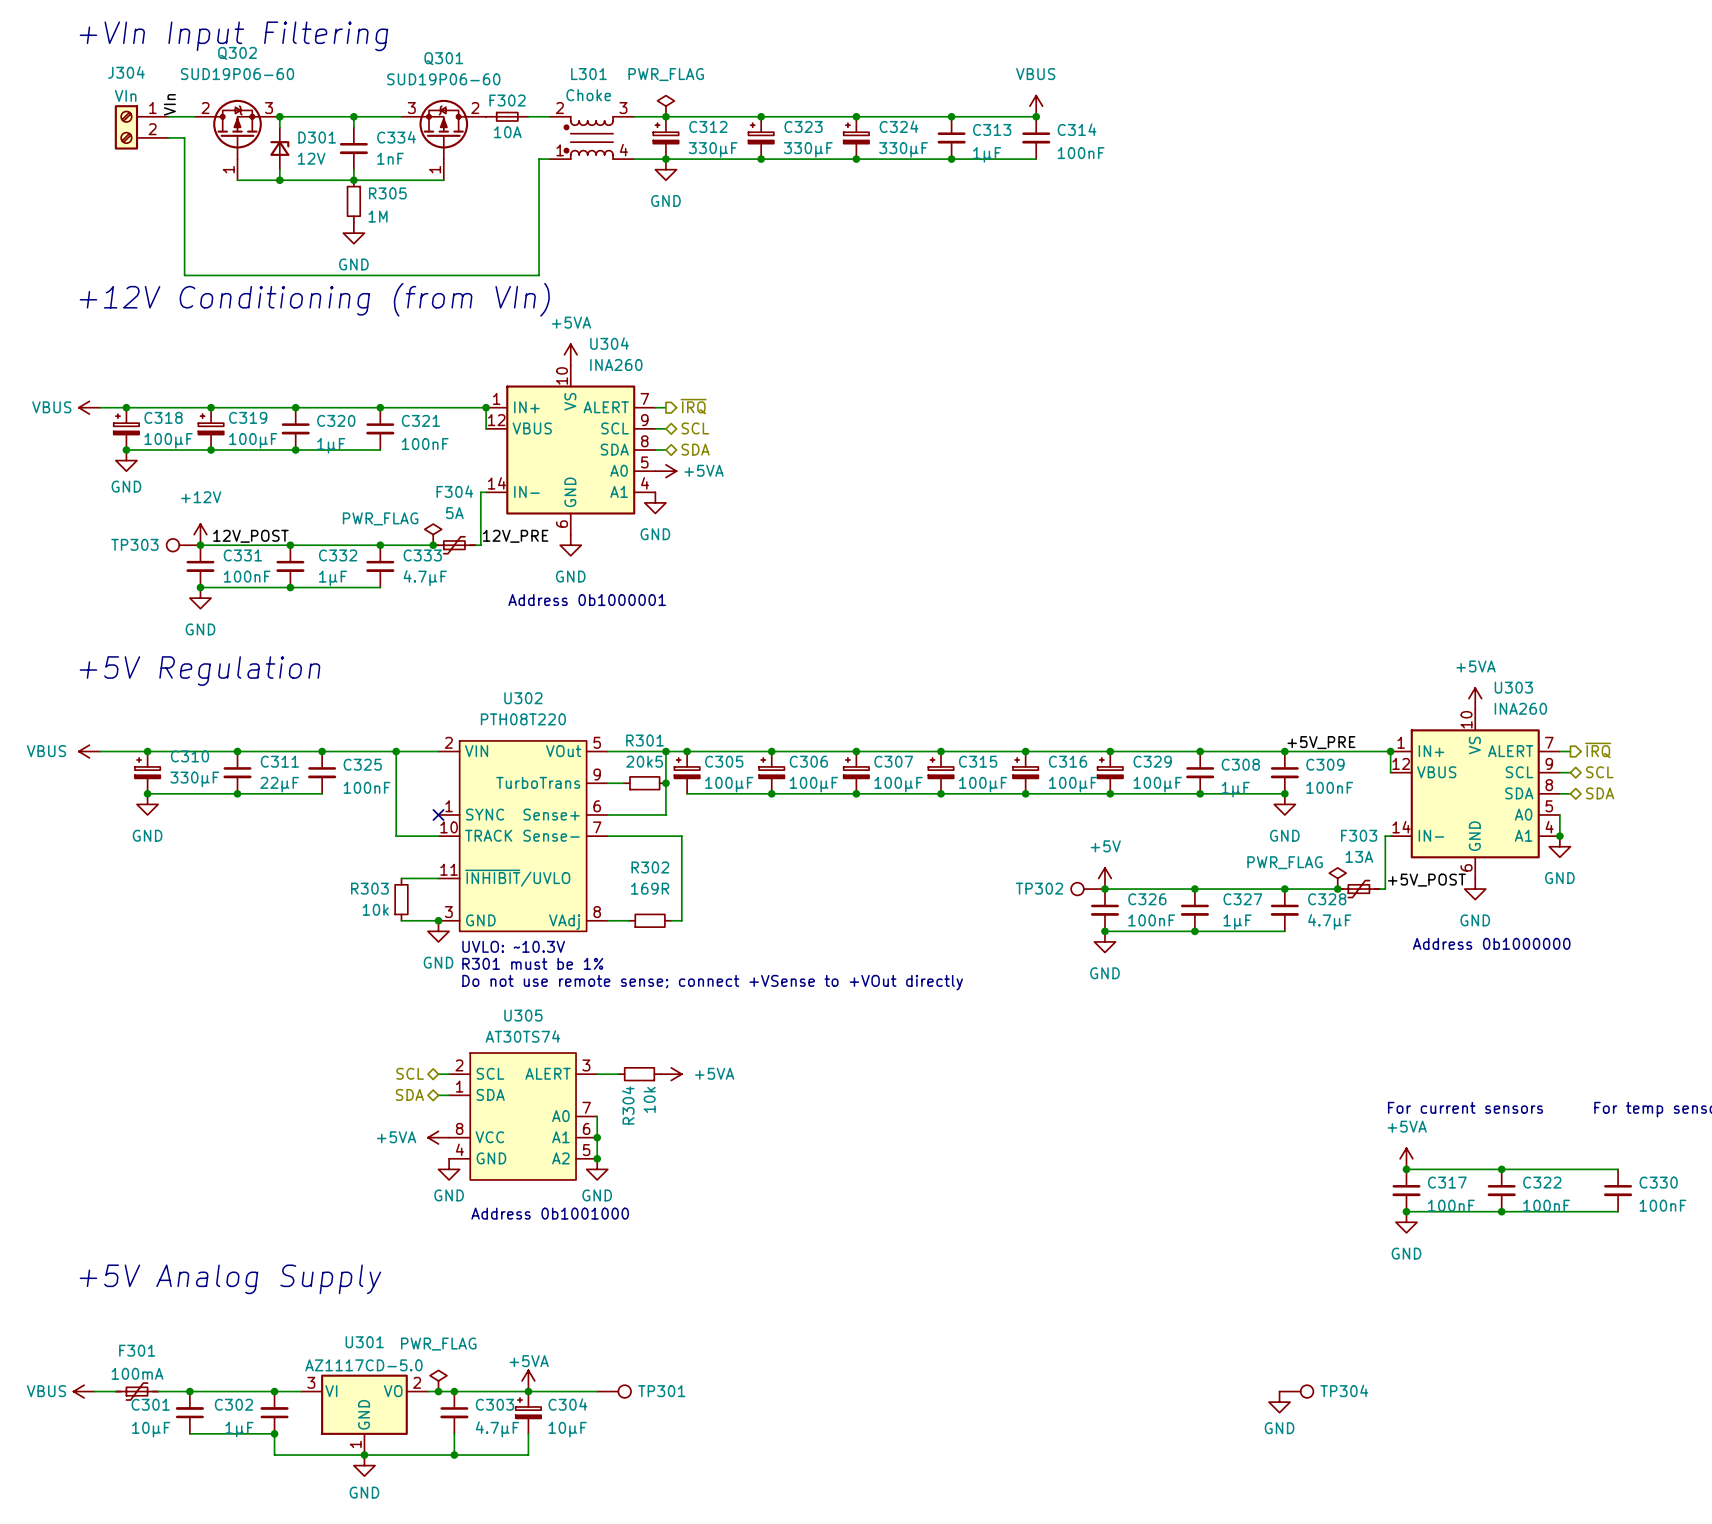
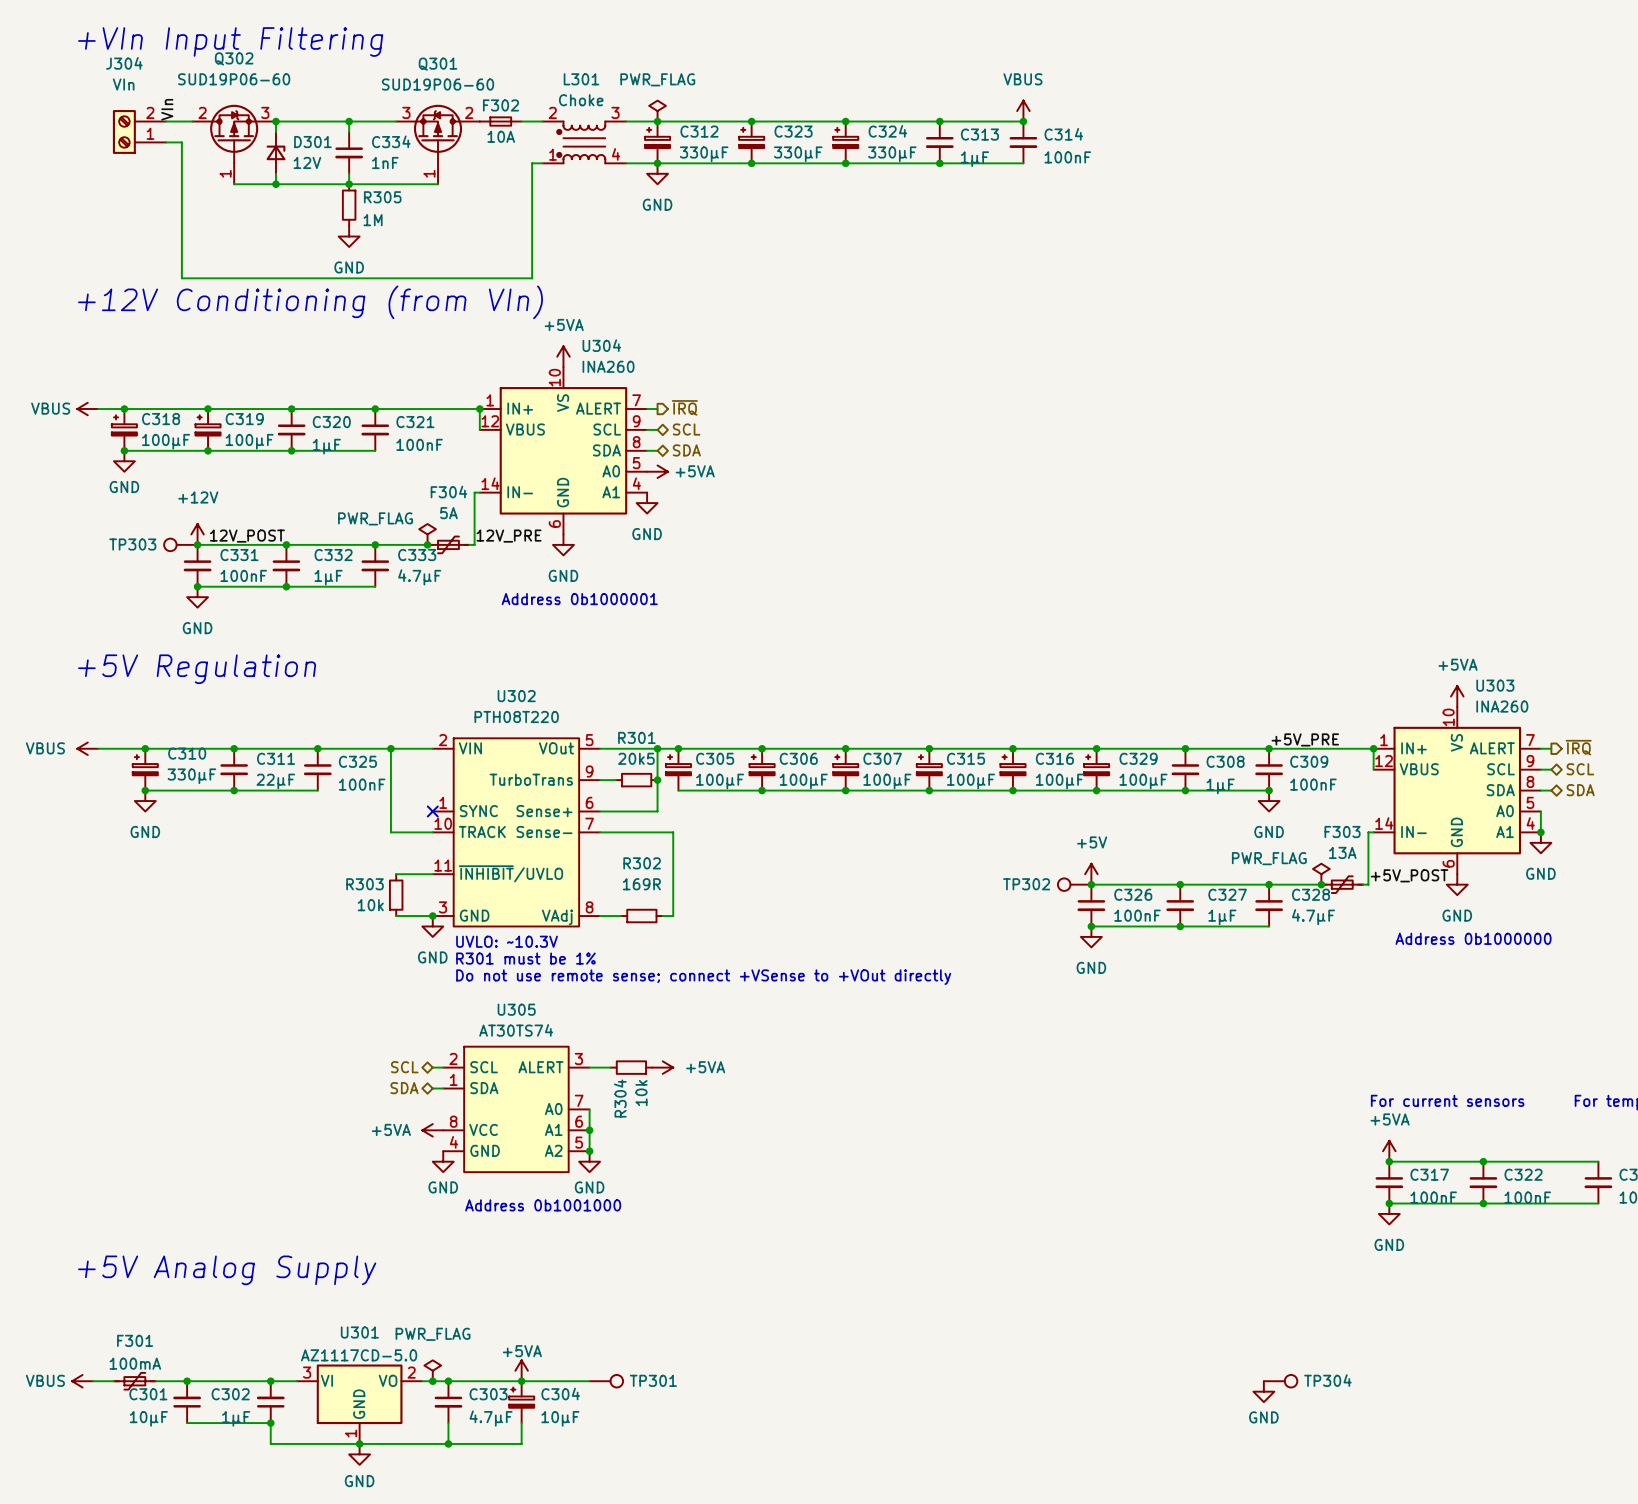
J304 flip: as is (126, 127) -> up-down (124, 131)

